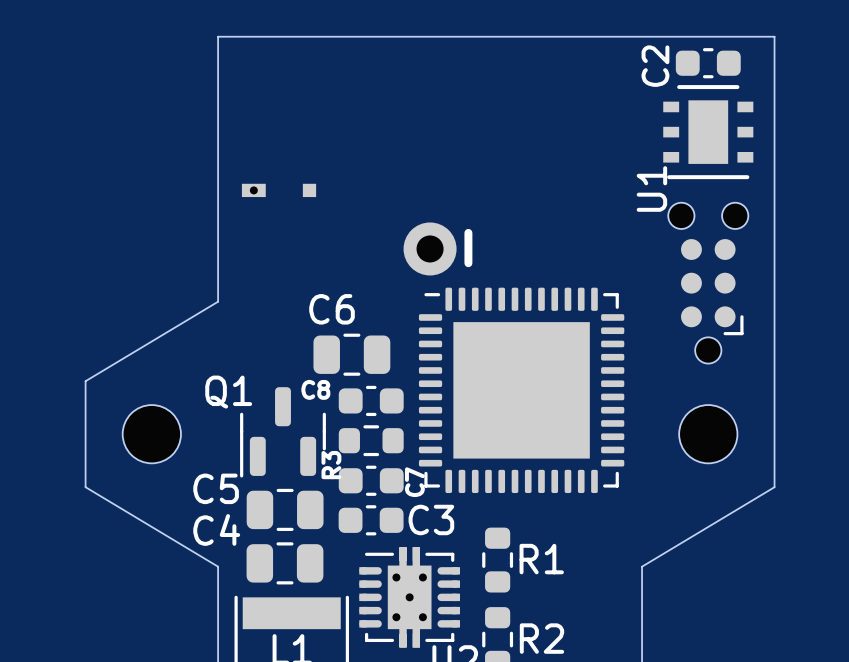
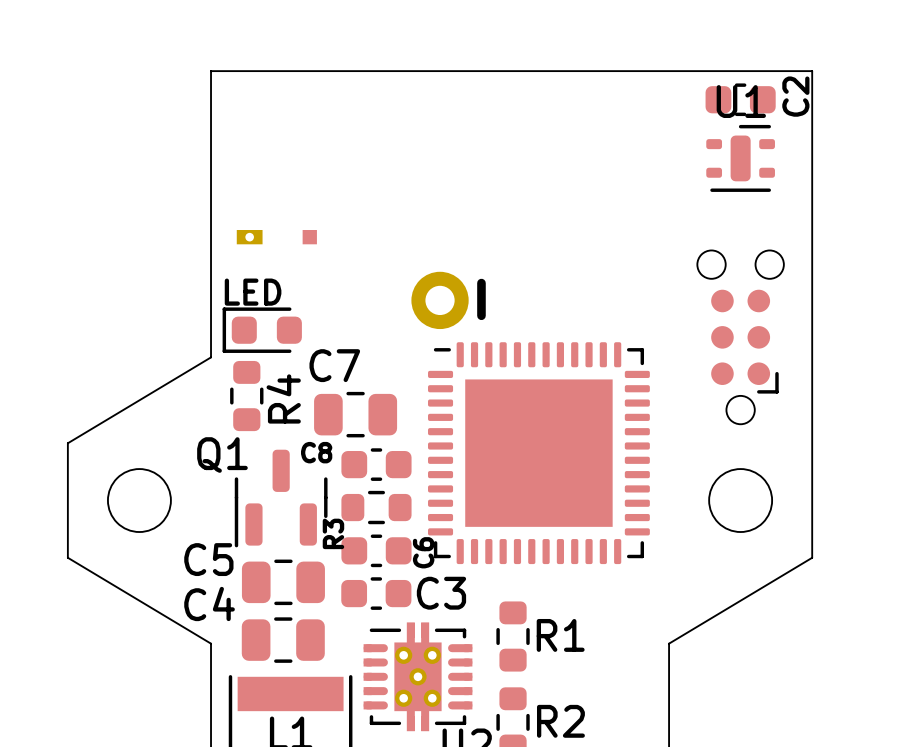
C2 name position: C2 (655, 66) -> C2 (795, 96)
U1 footprint: [663, 85, 754, 180] -> [706, 124, 775, 192]
U1 name position: U1 (651, 188) -> U1 (741, 101)
text: none -> LED (253, 292)
part: none -> (262, 330)
C6 name: C6 (332, 309) -> C7 (334, 365)
R4: none -> (246, 396)
C7 name: C7 (414, 482) -> C6 (423, 552)

